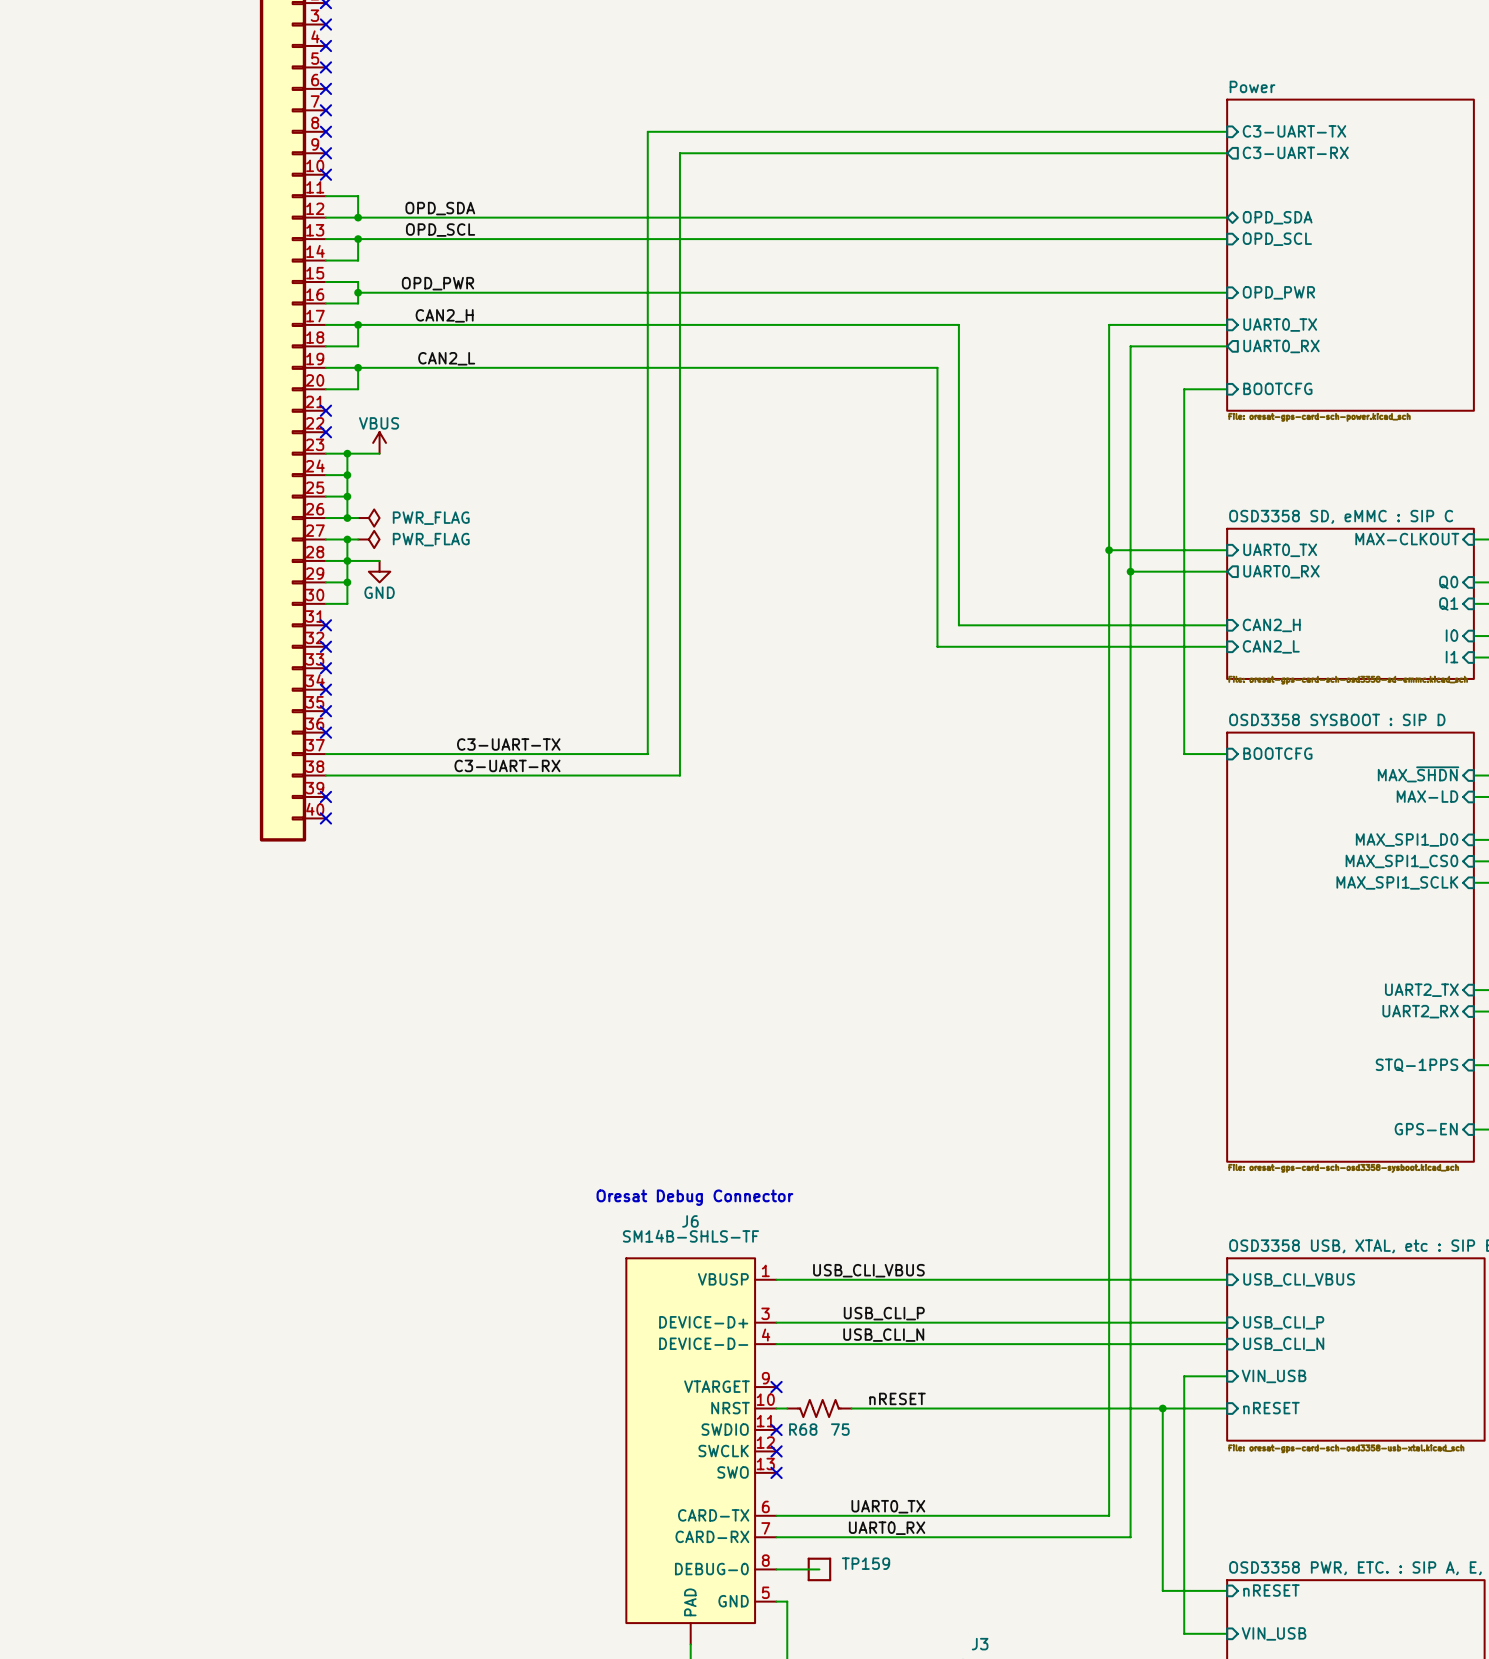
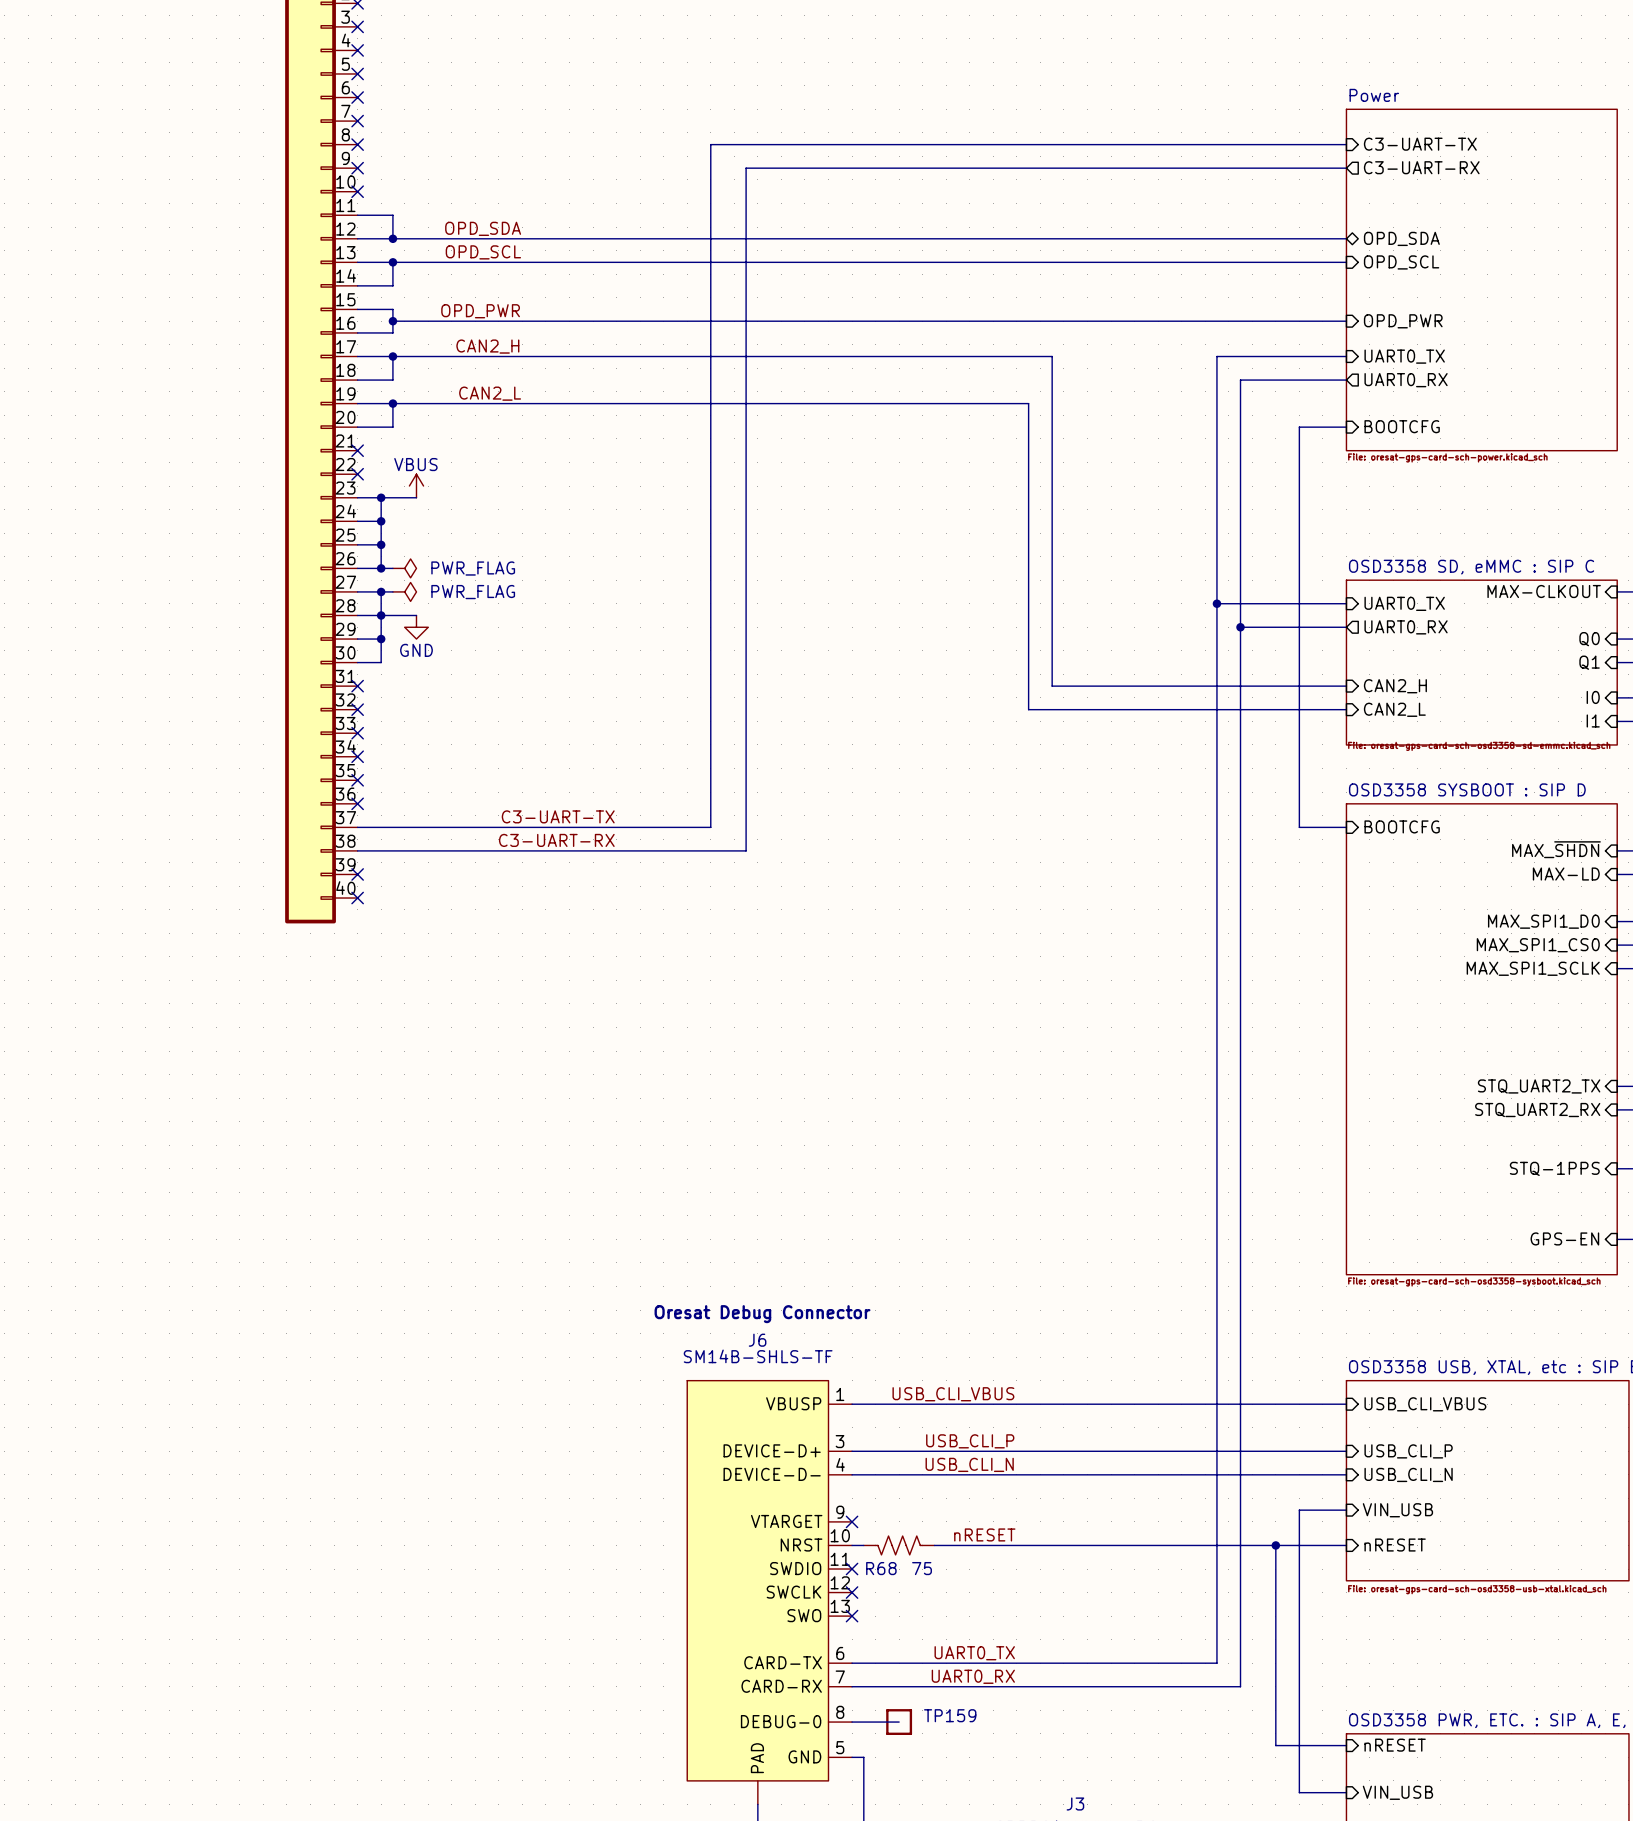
sheet pin: UART2_TX (1421, 990) -> STQ_UART2_TX (1539, 1086)
sheet pin: UART2_RX (1420, 1011) -> STQ_UART2_RX (1537, 1110)

